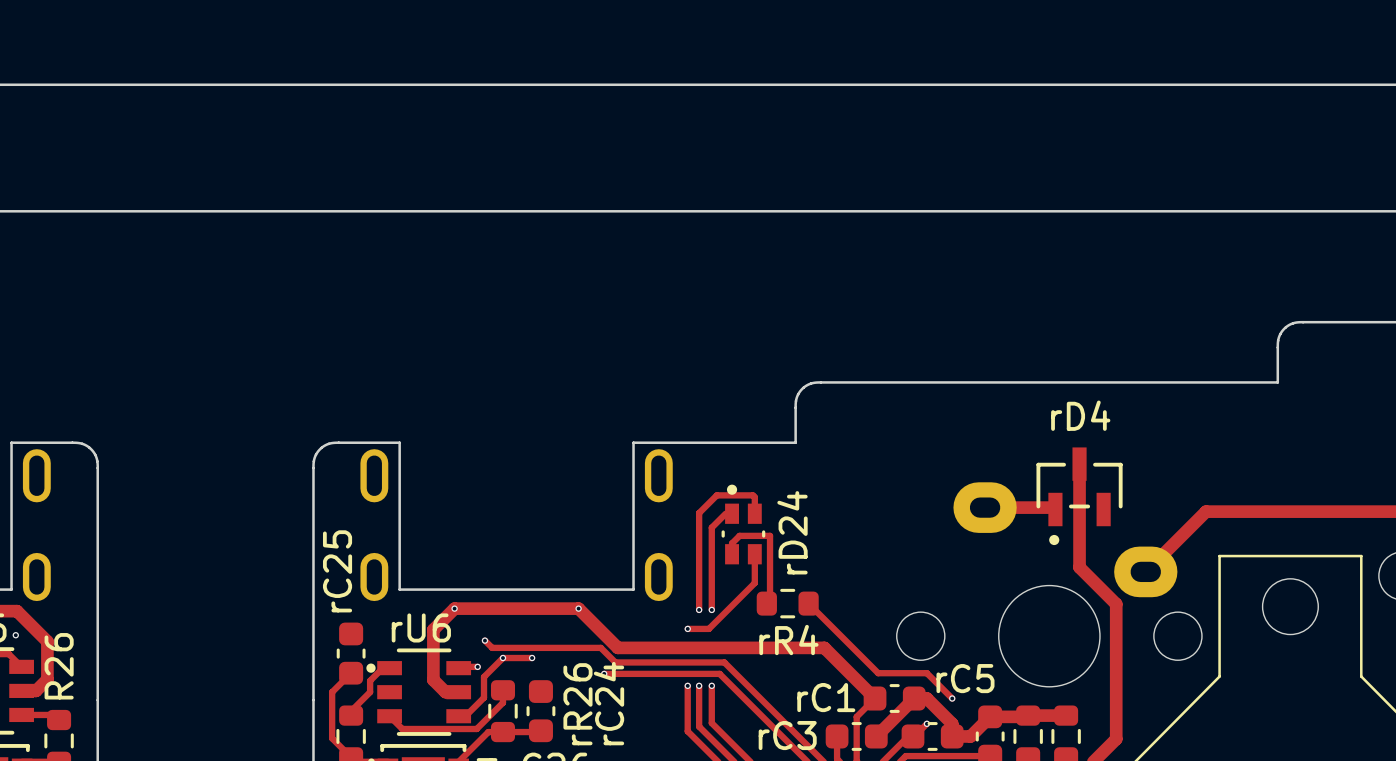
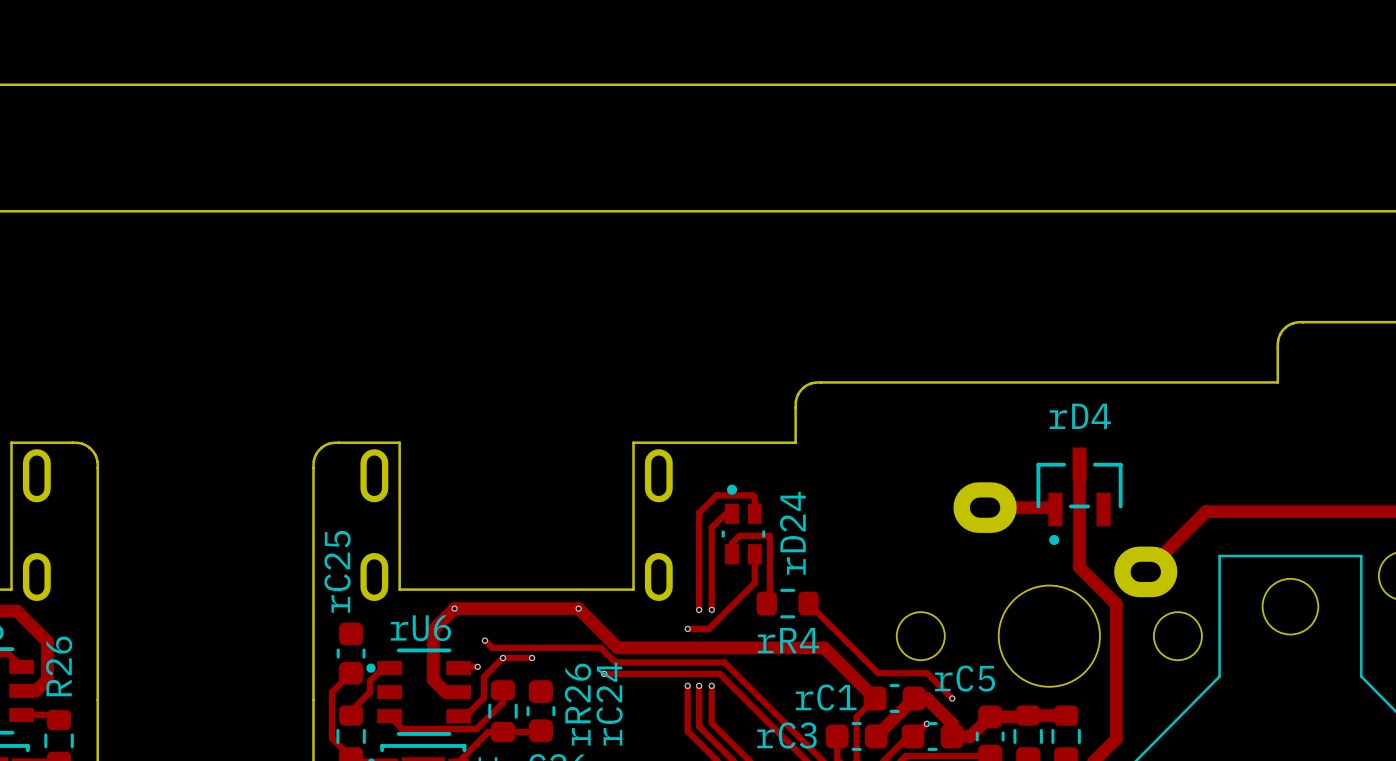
via: (15, 635) -> none

